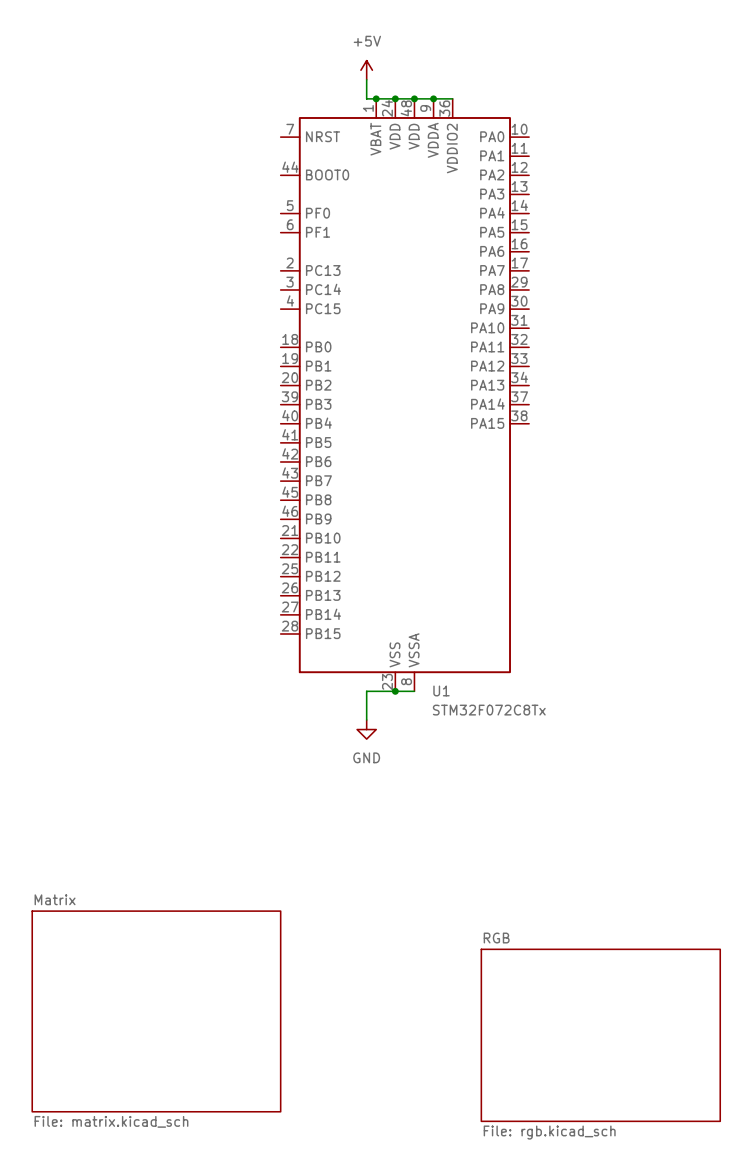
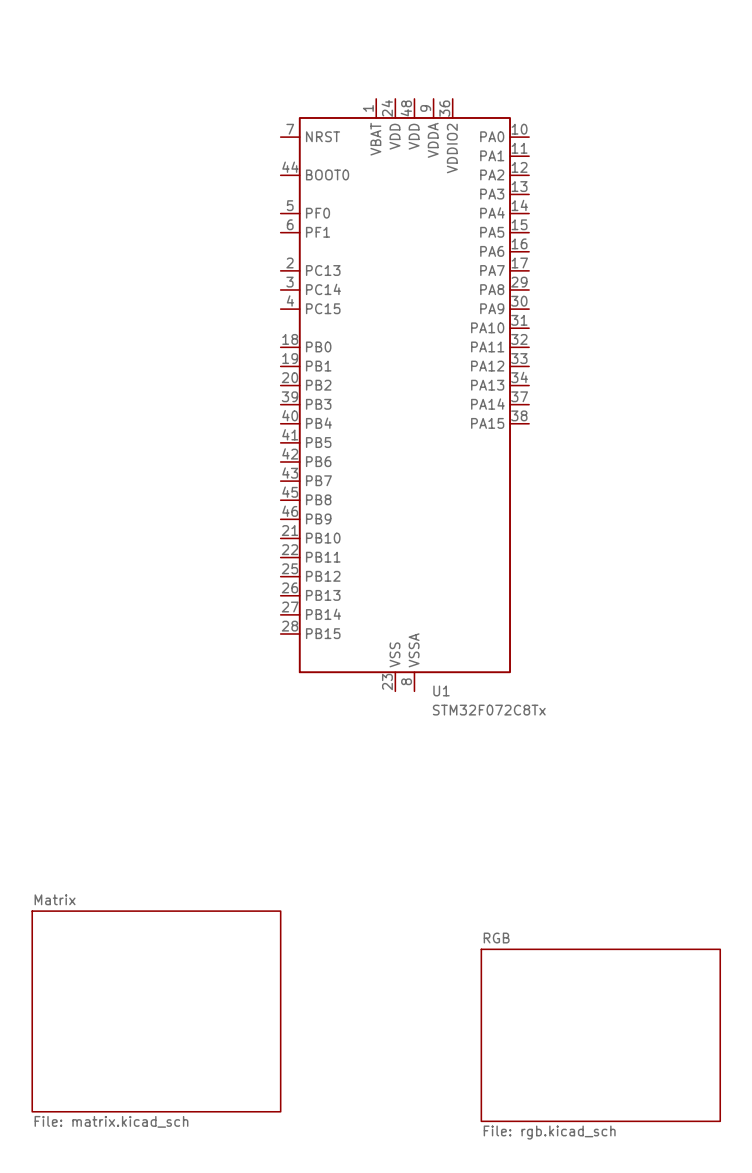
power symbol: +5V (366, 70) -> none
wire: (366, 79) (366, 98) (452, 98) -> none
junction: (376, 98) -> none
junction: (395, 98) -> none
junction: (414, 98) -> none
junction: (433, 98) -> none
junction: (395, 691) -> none
wire: (414, 691) (366, 691) (366, 719) -> none
power symbol: GND (366, 729) -> none

